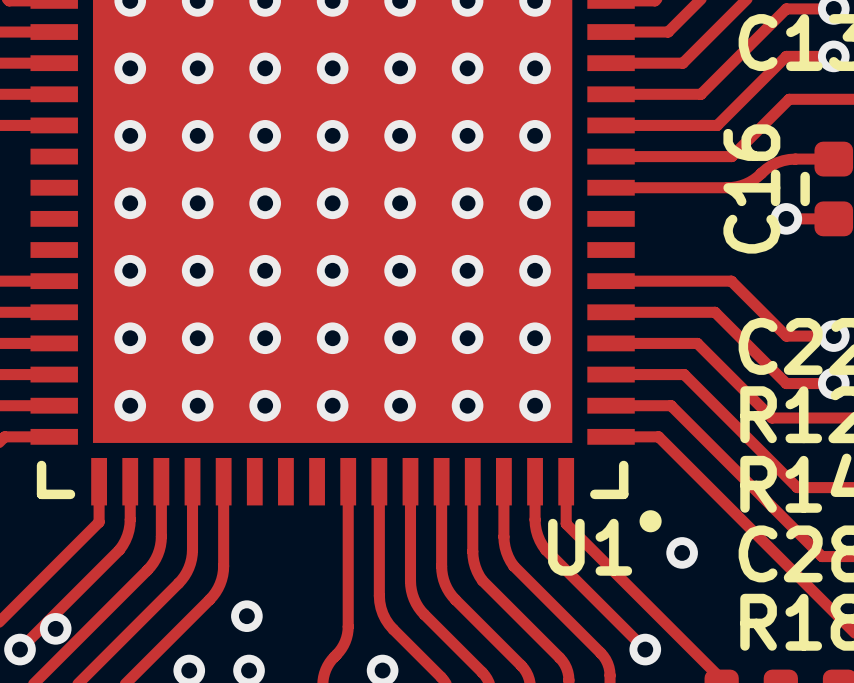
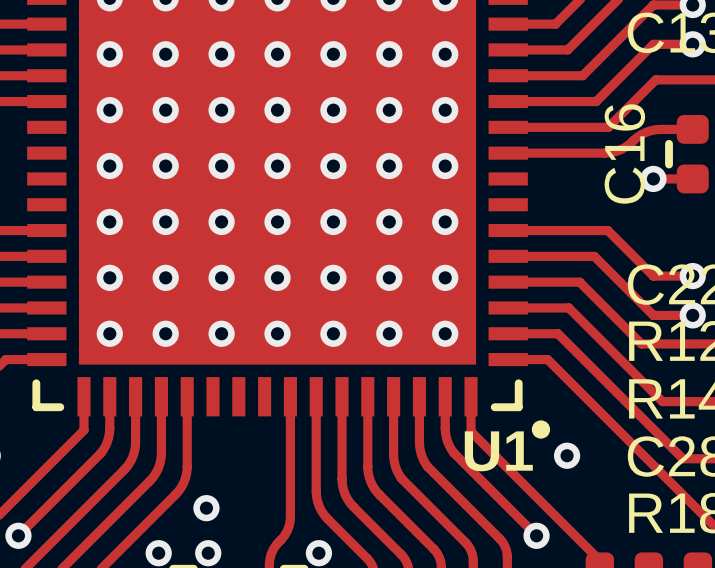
via: (55, 628) -> none

